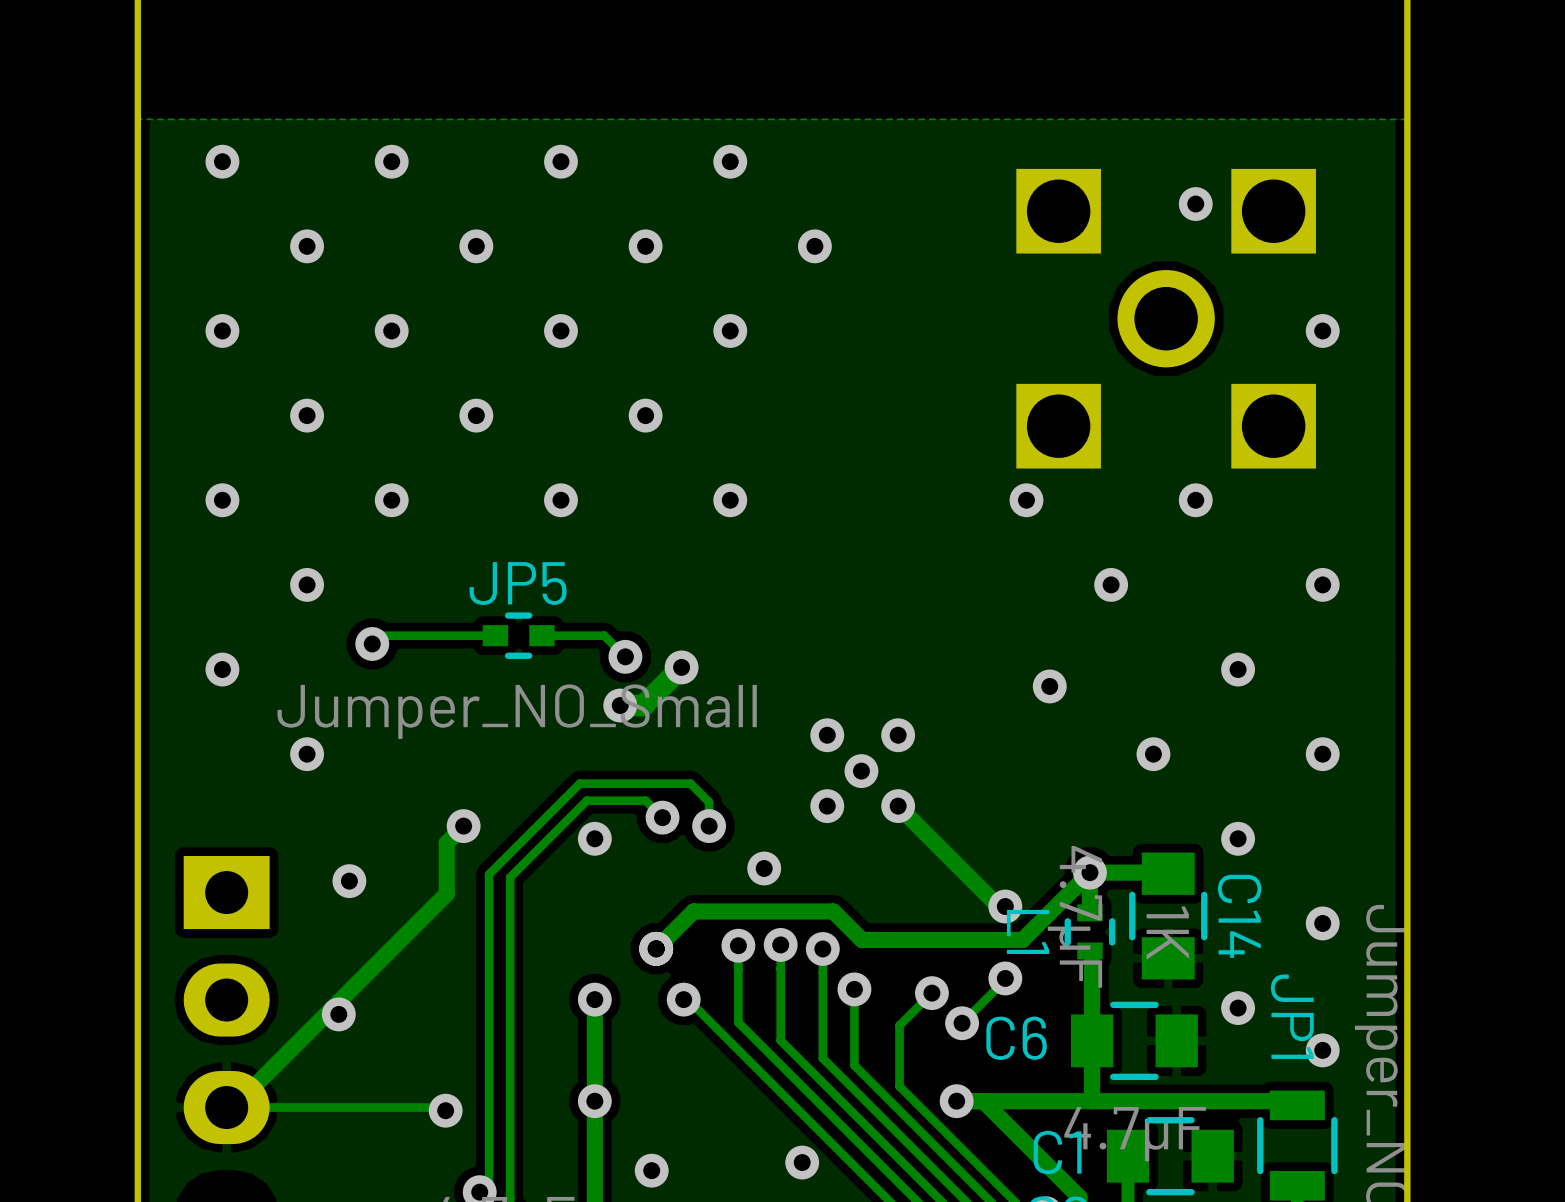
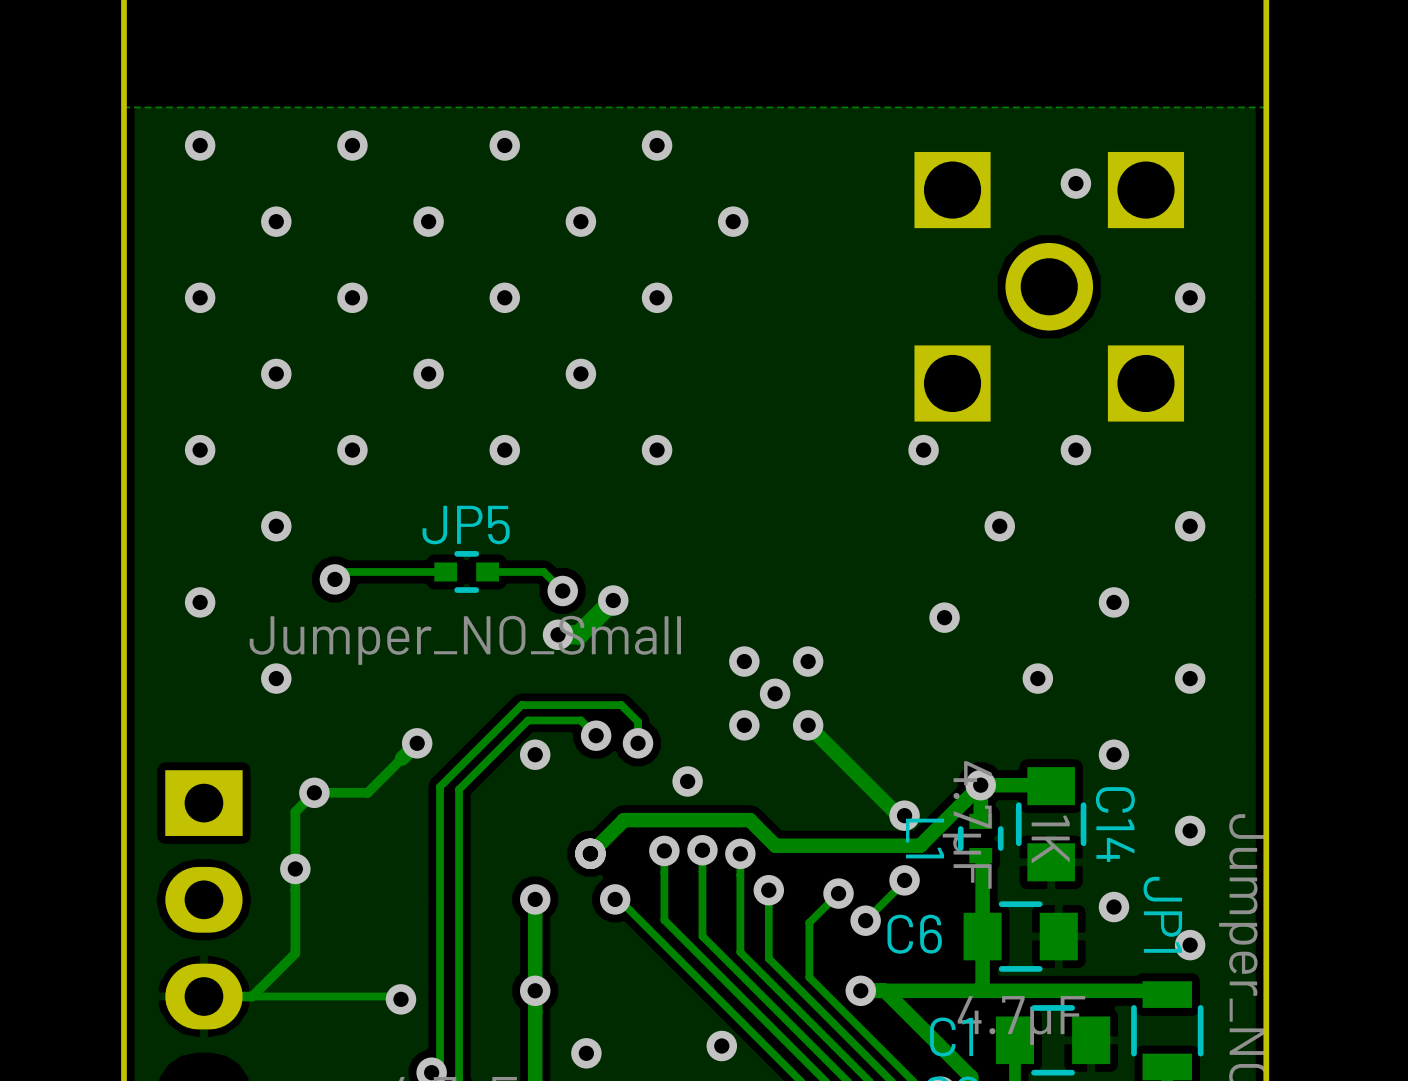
track: (446, 843) (446, 893) (233, 1107) -> (401, 758) (367, 792) (314, 792) (295, 811) (295, 953) (252, 996) (203, 996)
via position: (338, 1014) -> (295, 868)

